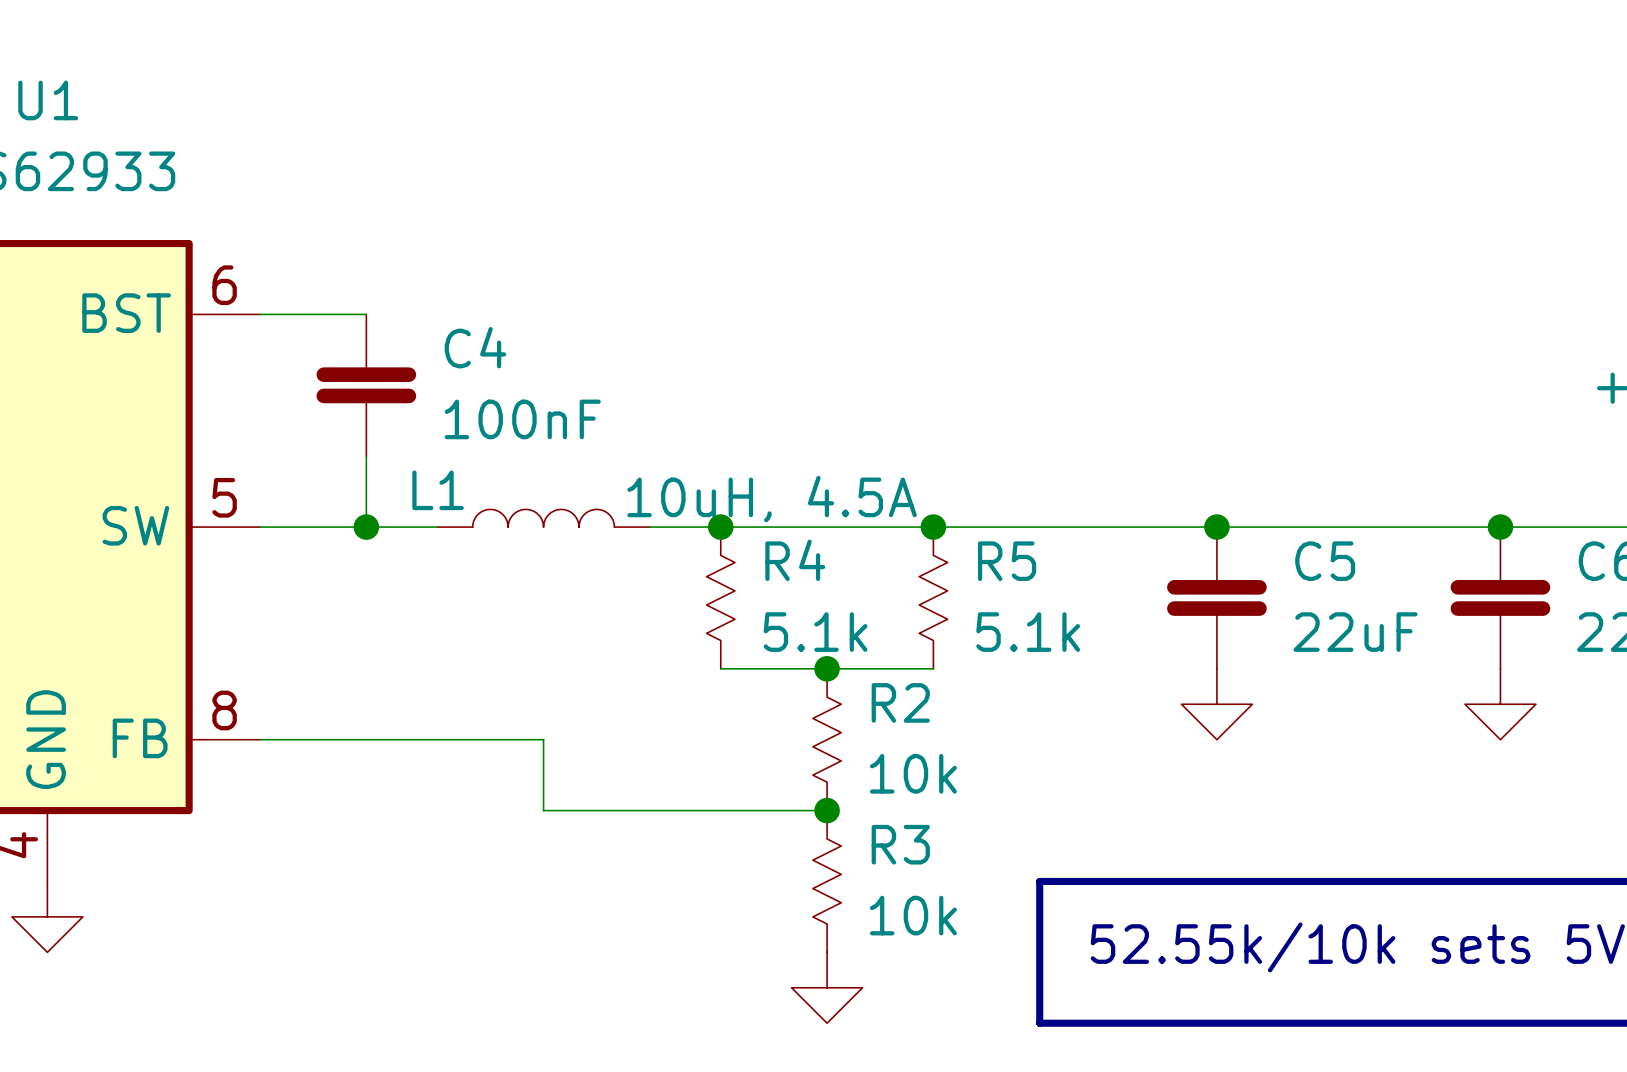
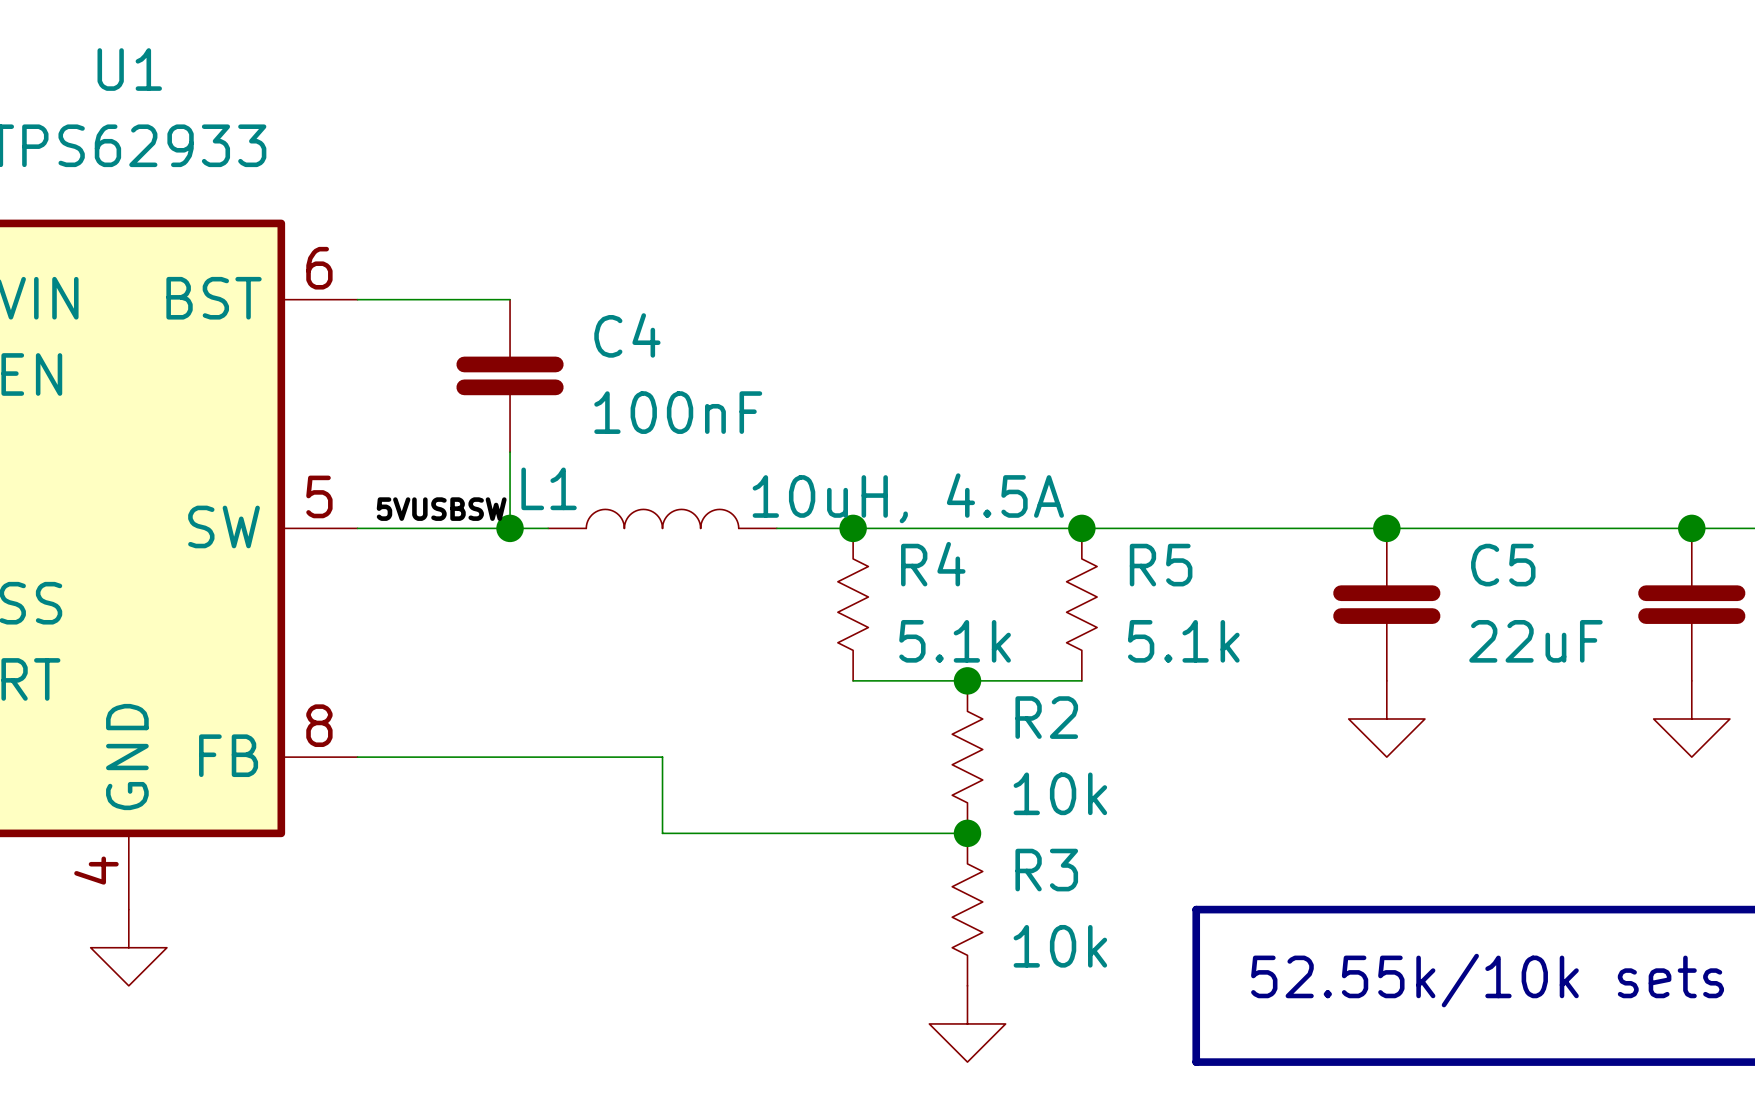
wire: none -> (471, 299) (510, 299)
C4 position: (366, 385) -> (510, 375)
wire: (366, 456) (366, 527) -> (510, 452) (510, 528)
label: none -> 5VUSBSW (441, 509)
junction position: (366, 527) -> (510, 528)

